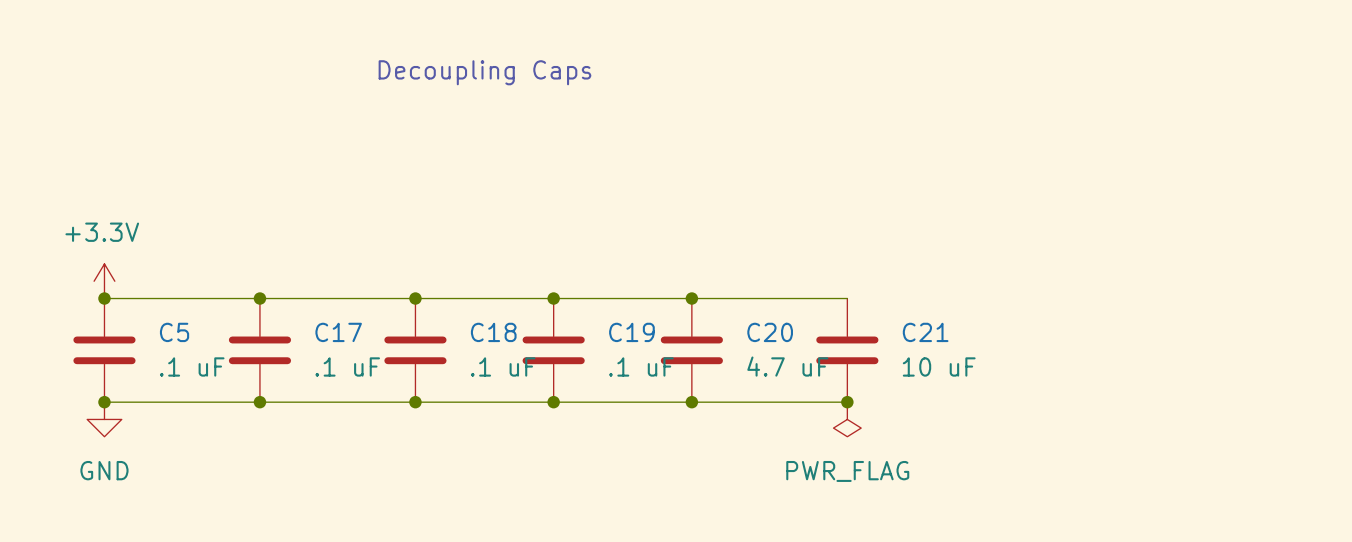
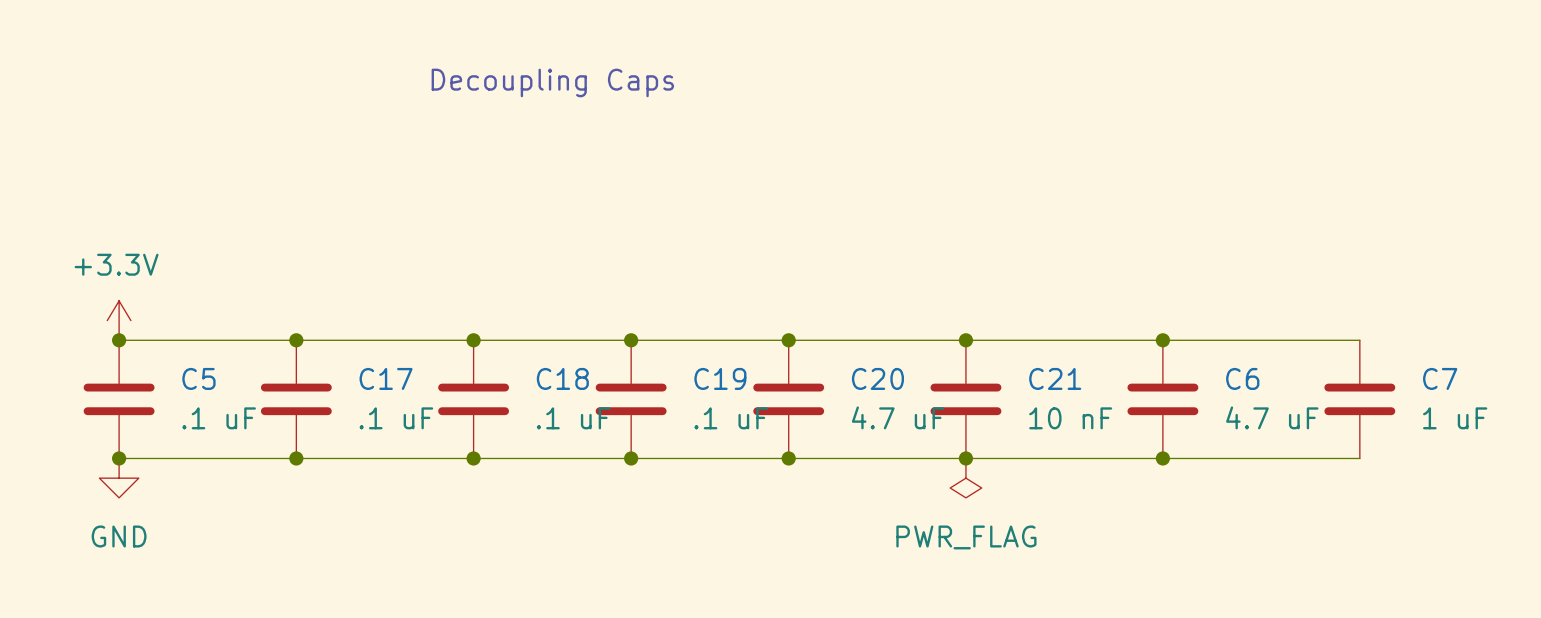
wire: none -> (965, 340) (1359, 340)
junction: none -> (965, 340)
junction: none -> (1162, 340)
C6: none -> 4.7 uF (1162, 399)
C7: none -> 1 uF (1359, 399)
C21 value: 10 uF (939, 366) -> 10 nF (1070, 418)
wire: none -> (965, 458) (1359, 458)
junction: none -> (1162, 458)

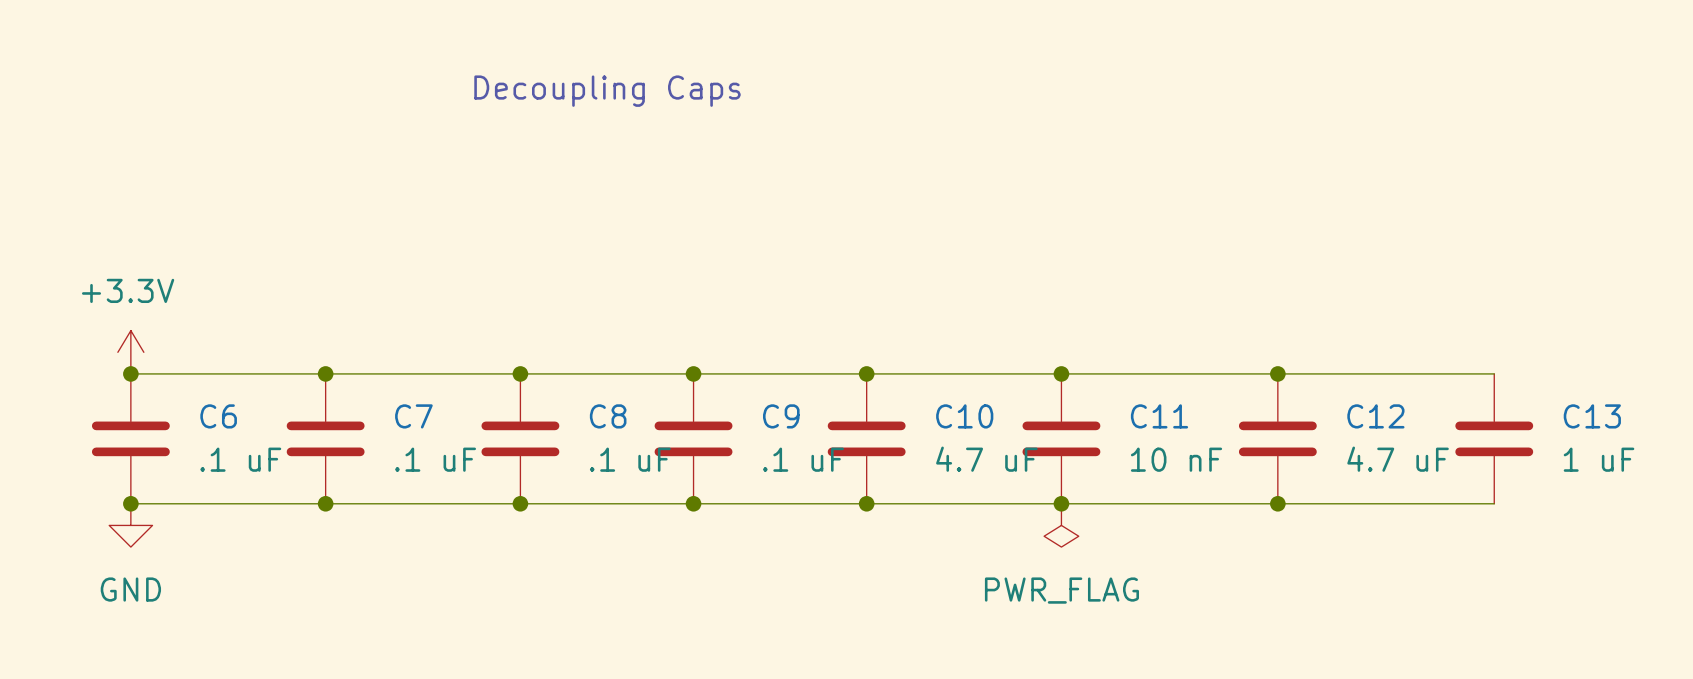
C5 name: C5 (198, 378) -> C6 (218, 416)
C17 name: C17 (386, 378) -> C7 (413, 416)
C18 name: C18 (562, 378) -> C8 (608, 416)
C19 name: C19 (720, 378) -> C9 (781, 416)
C20 name: C20 (877, 378) -> C10 (964, 416)
C21 name: C21 (1055, 378) -> C11 (1159, 416)
C6 name: C6 (1242, 378) -> C12 (1375, 416)
C7 name: C7 (1440, 378) -> C13 (1592, 416)

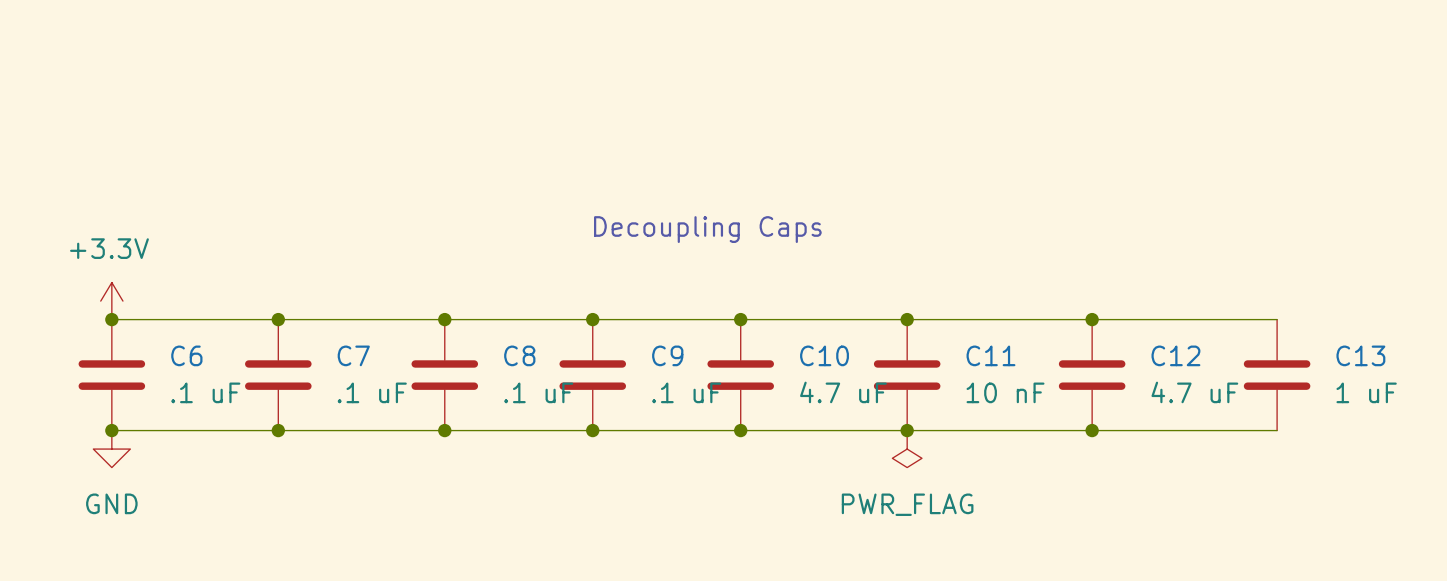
text position: Decoupling Caps (607, 91) -> Decoupling Caps (707, 229)

